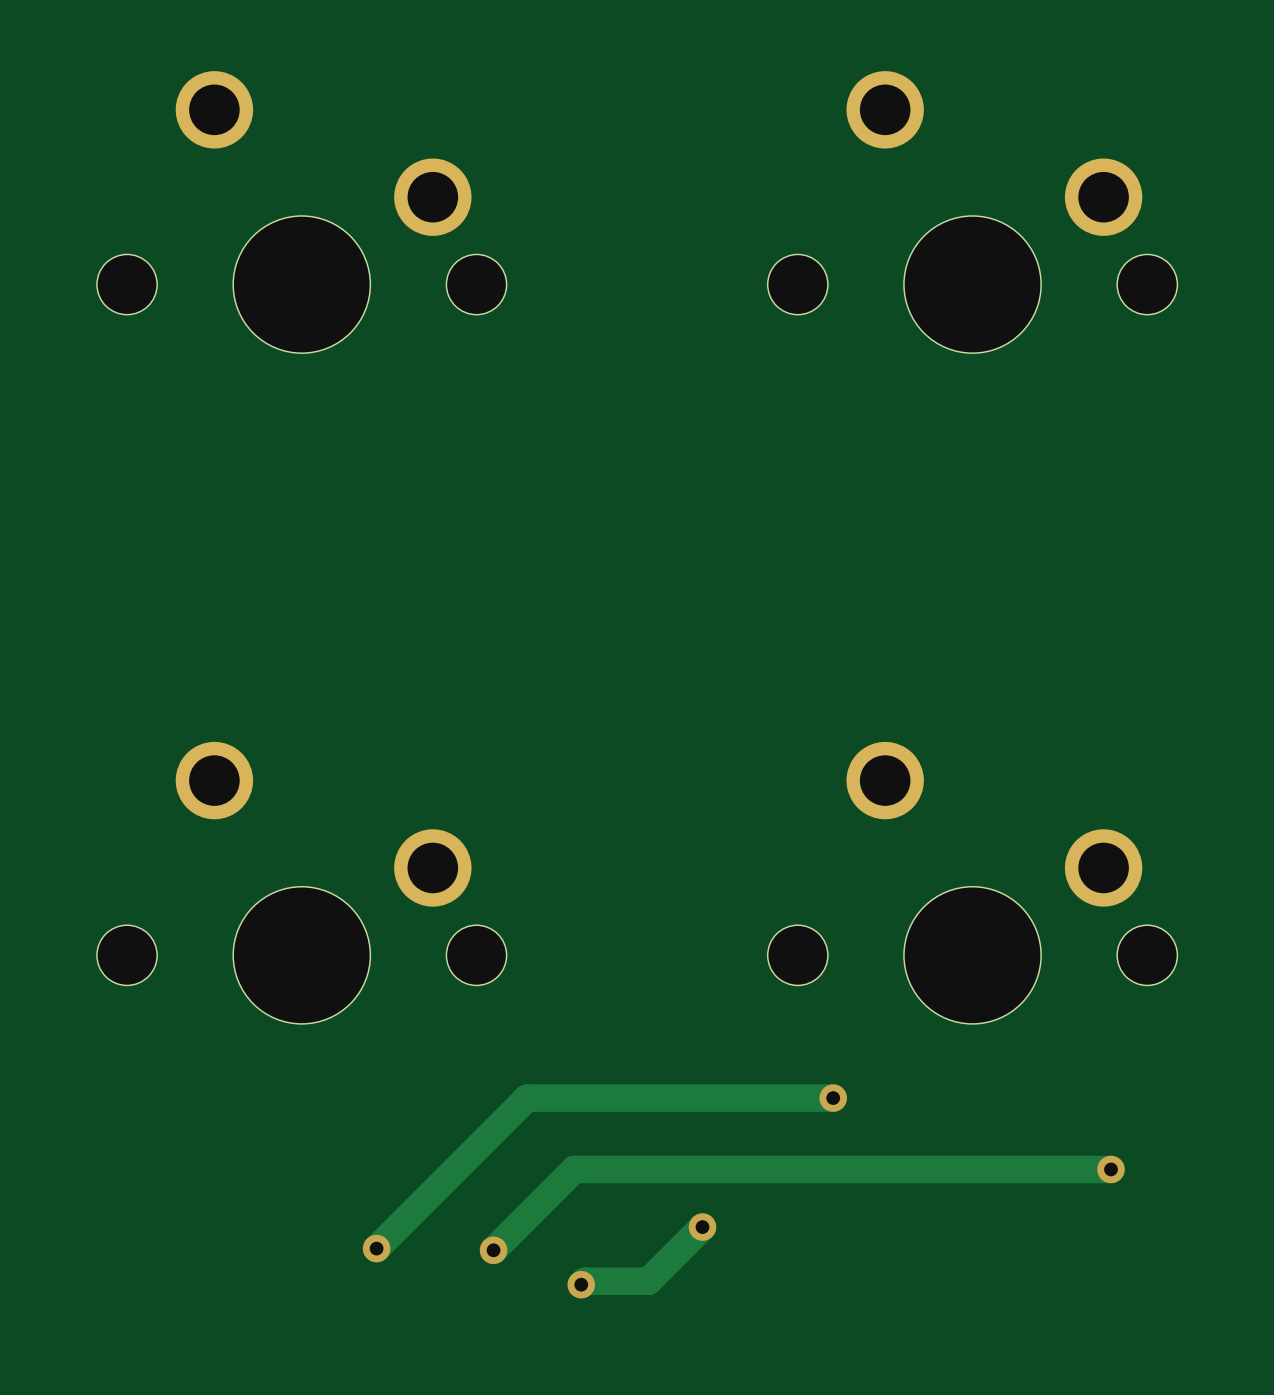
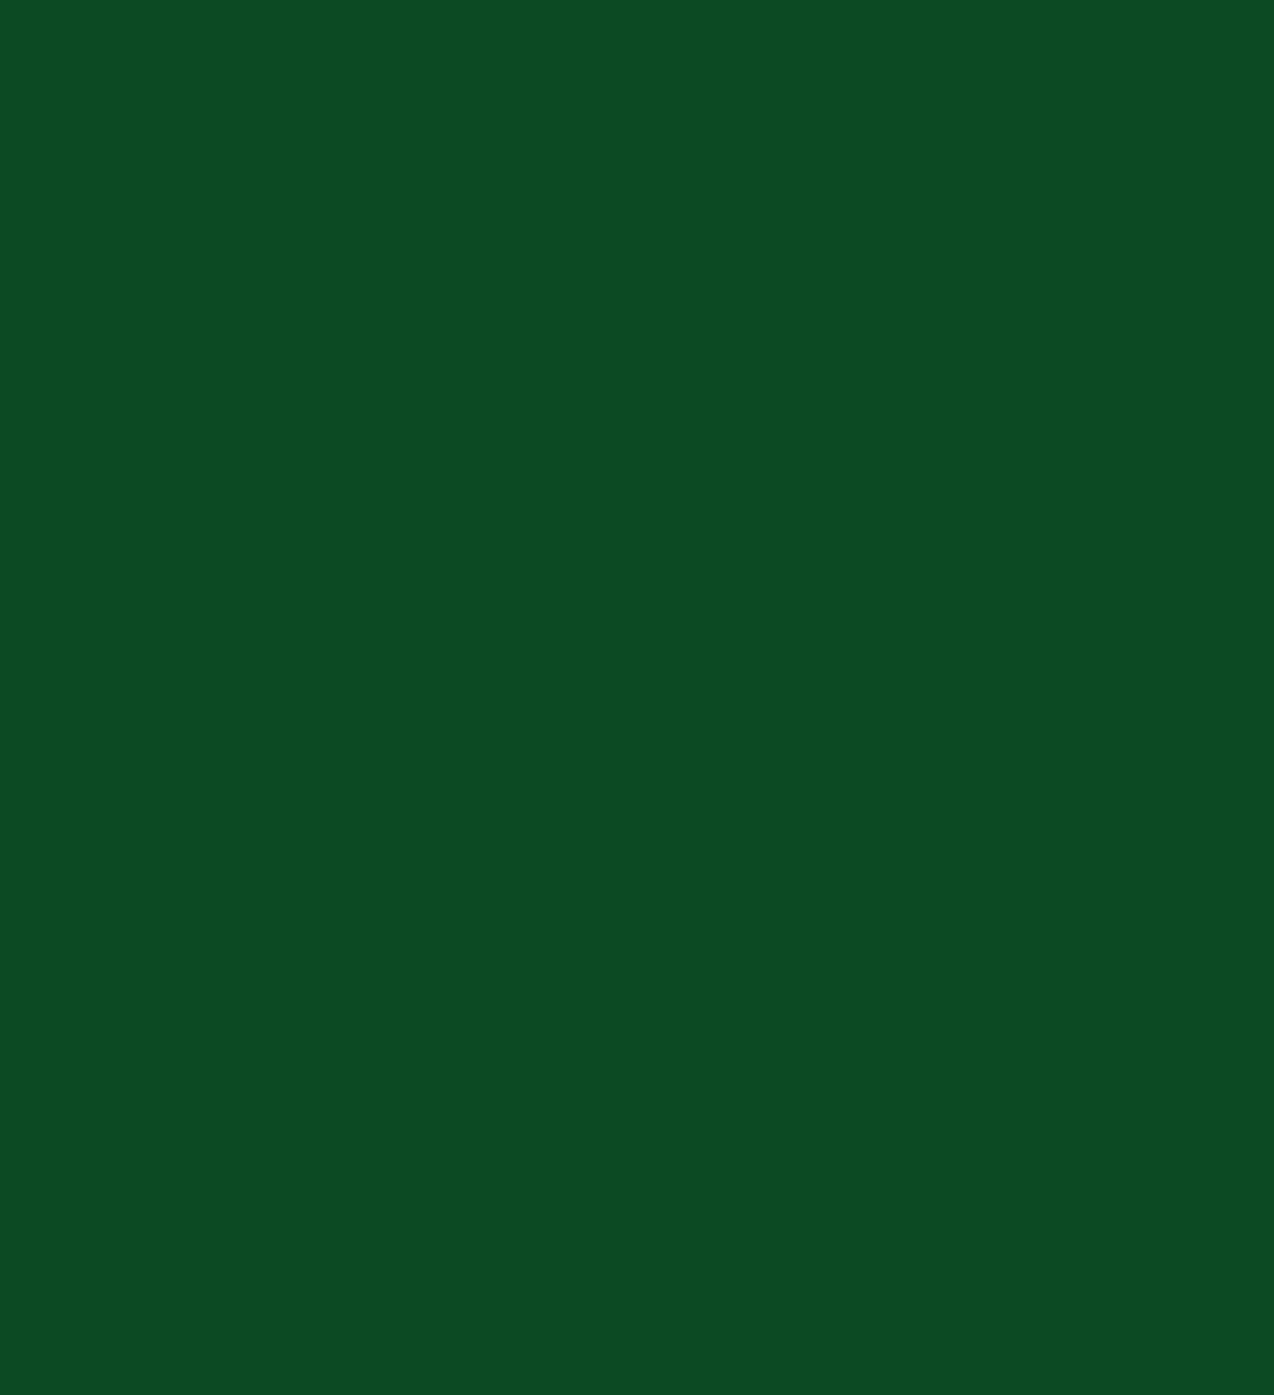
part: (301, 212) -> none
part: (972, 212) -> none
part: (301, 882) -> none
part: (972, 882) -> none
track: (833, 1098) (527, 1098) (376, 1248) -> none
via: (833, 1098) -> none
track: (1110, 1169) (574, 1169) (493, 1250) -> none
via: (1110, 1169) -> none
track: (702, 1227) (648, 1281) (584, 1281) (581, 1284) -> none
via: (702, 1227) -> none
via: (376, 1248) -> none
via: (493, 1250) -> none
via: (581, 1284) -> none

